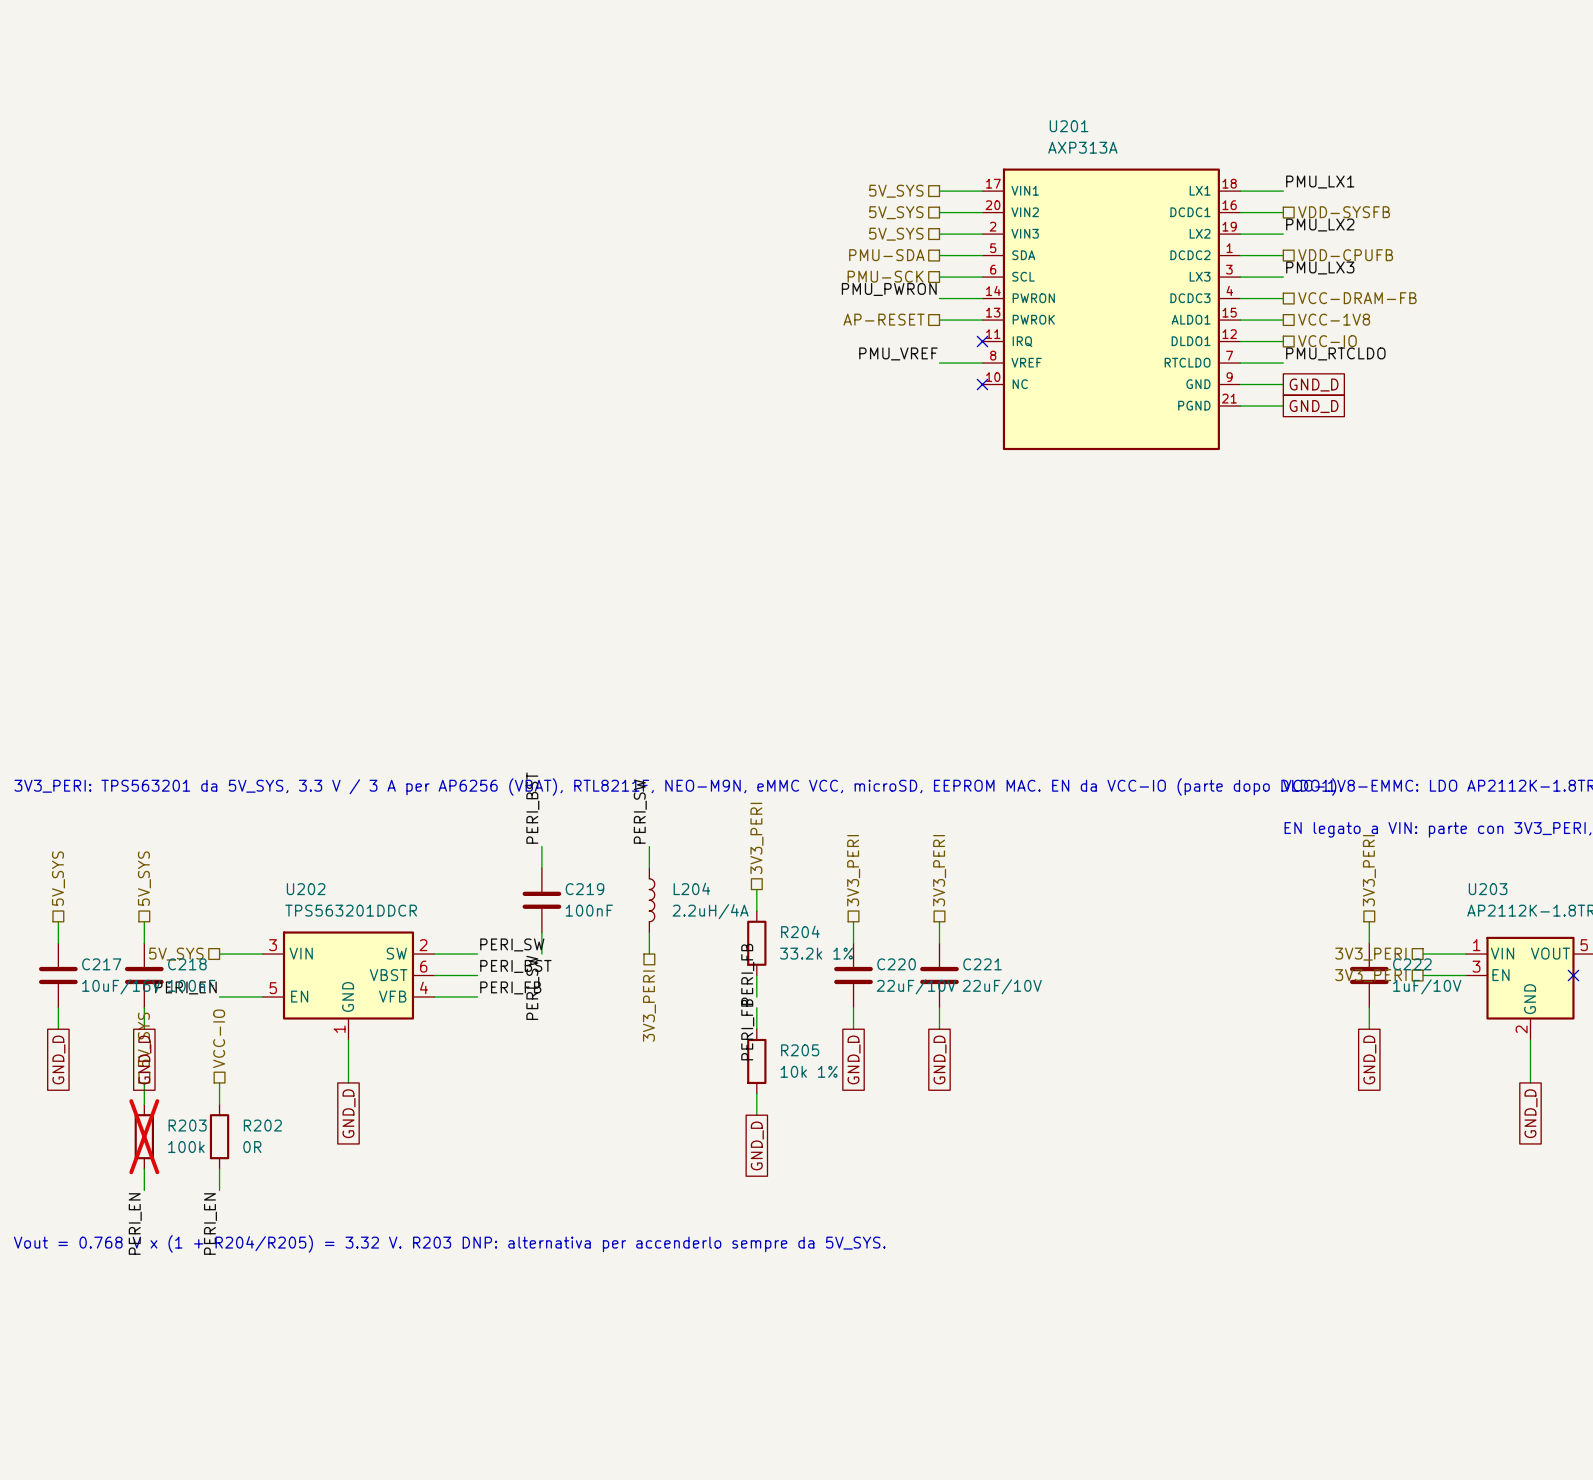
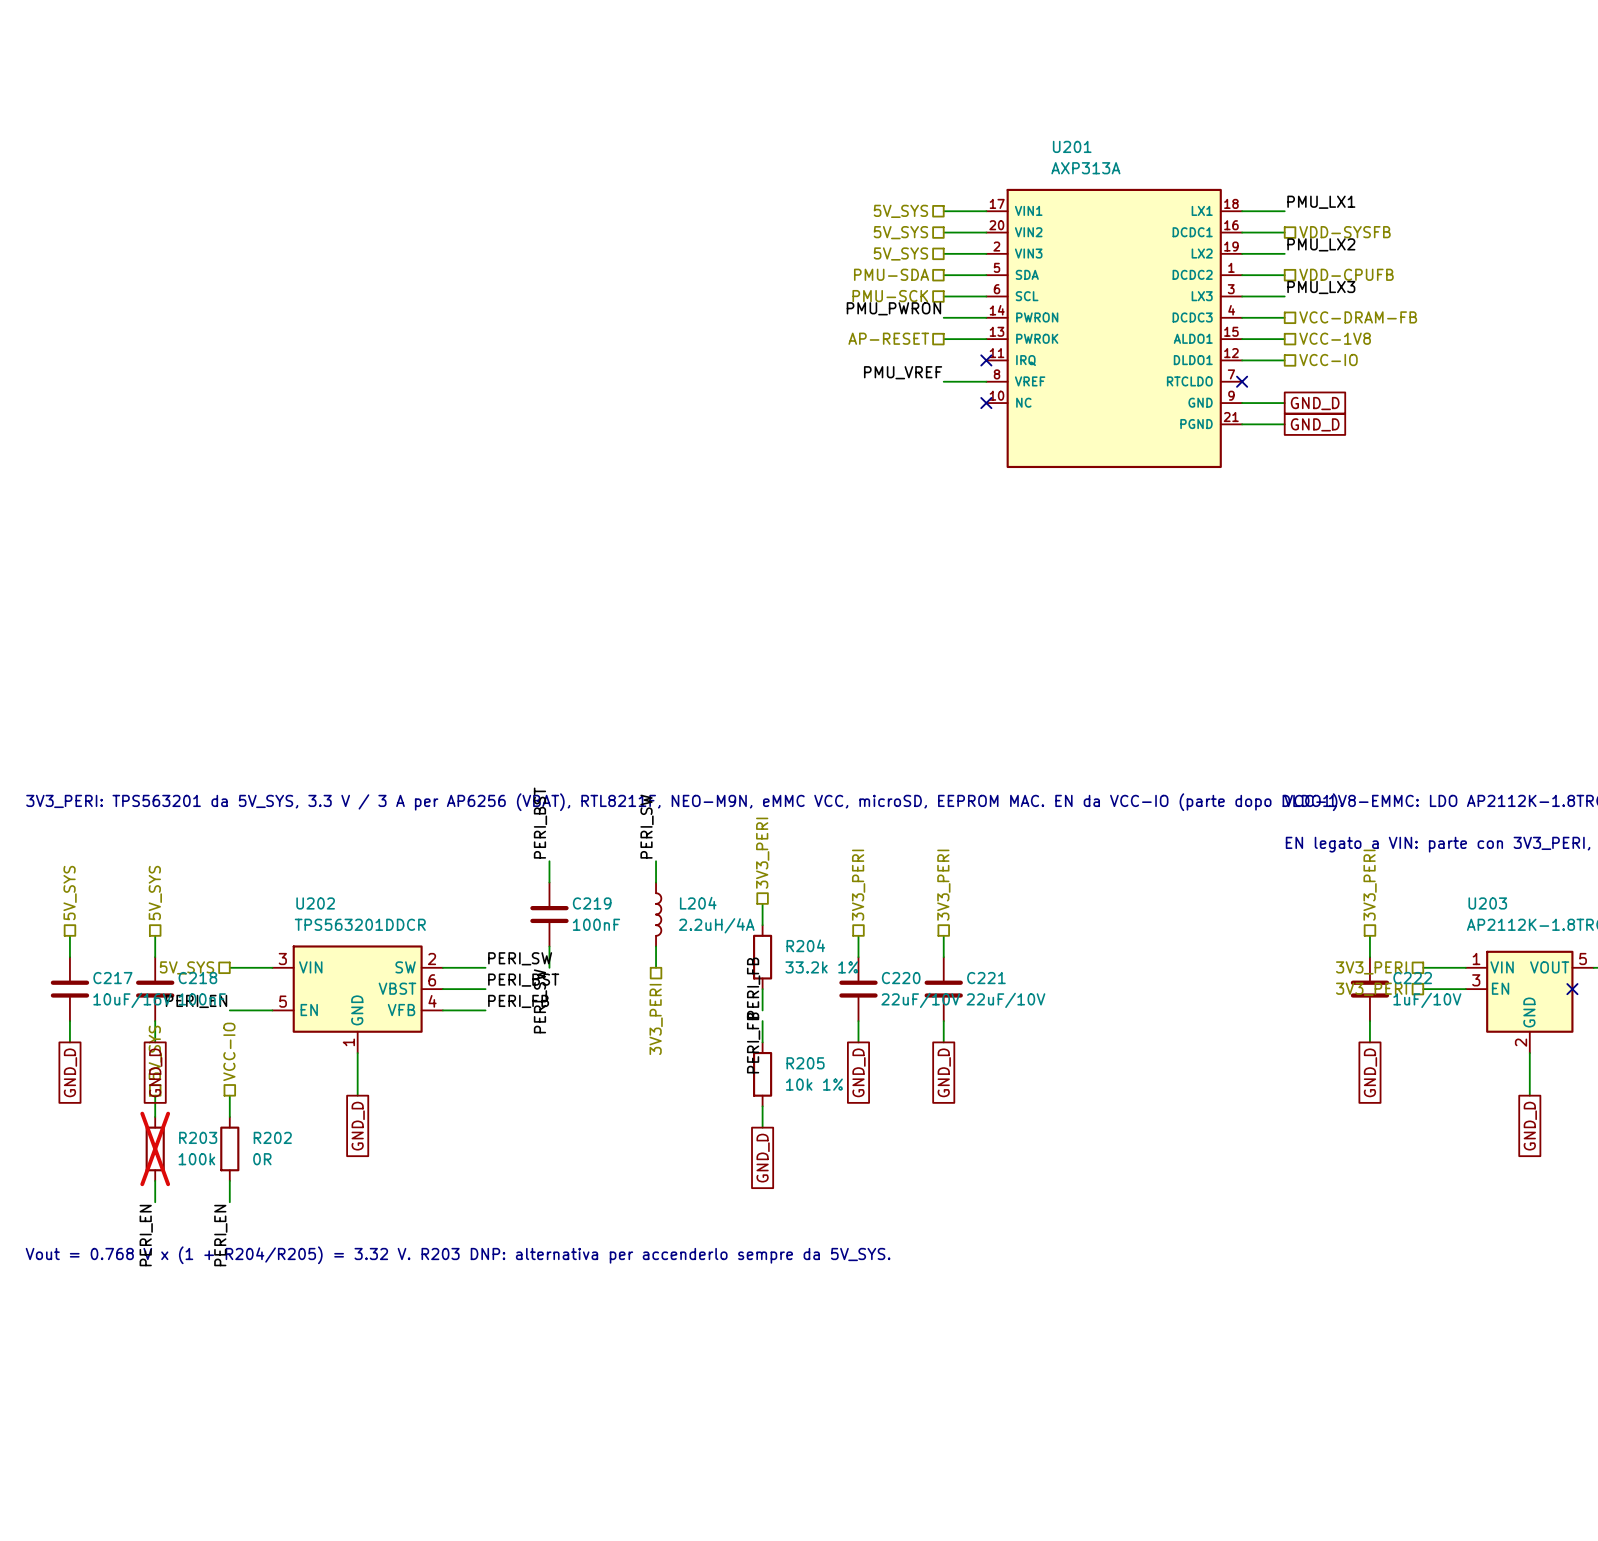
label: PMU_RTCLDO (1335, 353) -> none
wire: (1240, 363) (1283, 363) -> none
no-connect mark: none -> (1242, 381)

